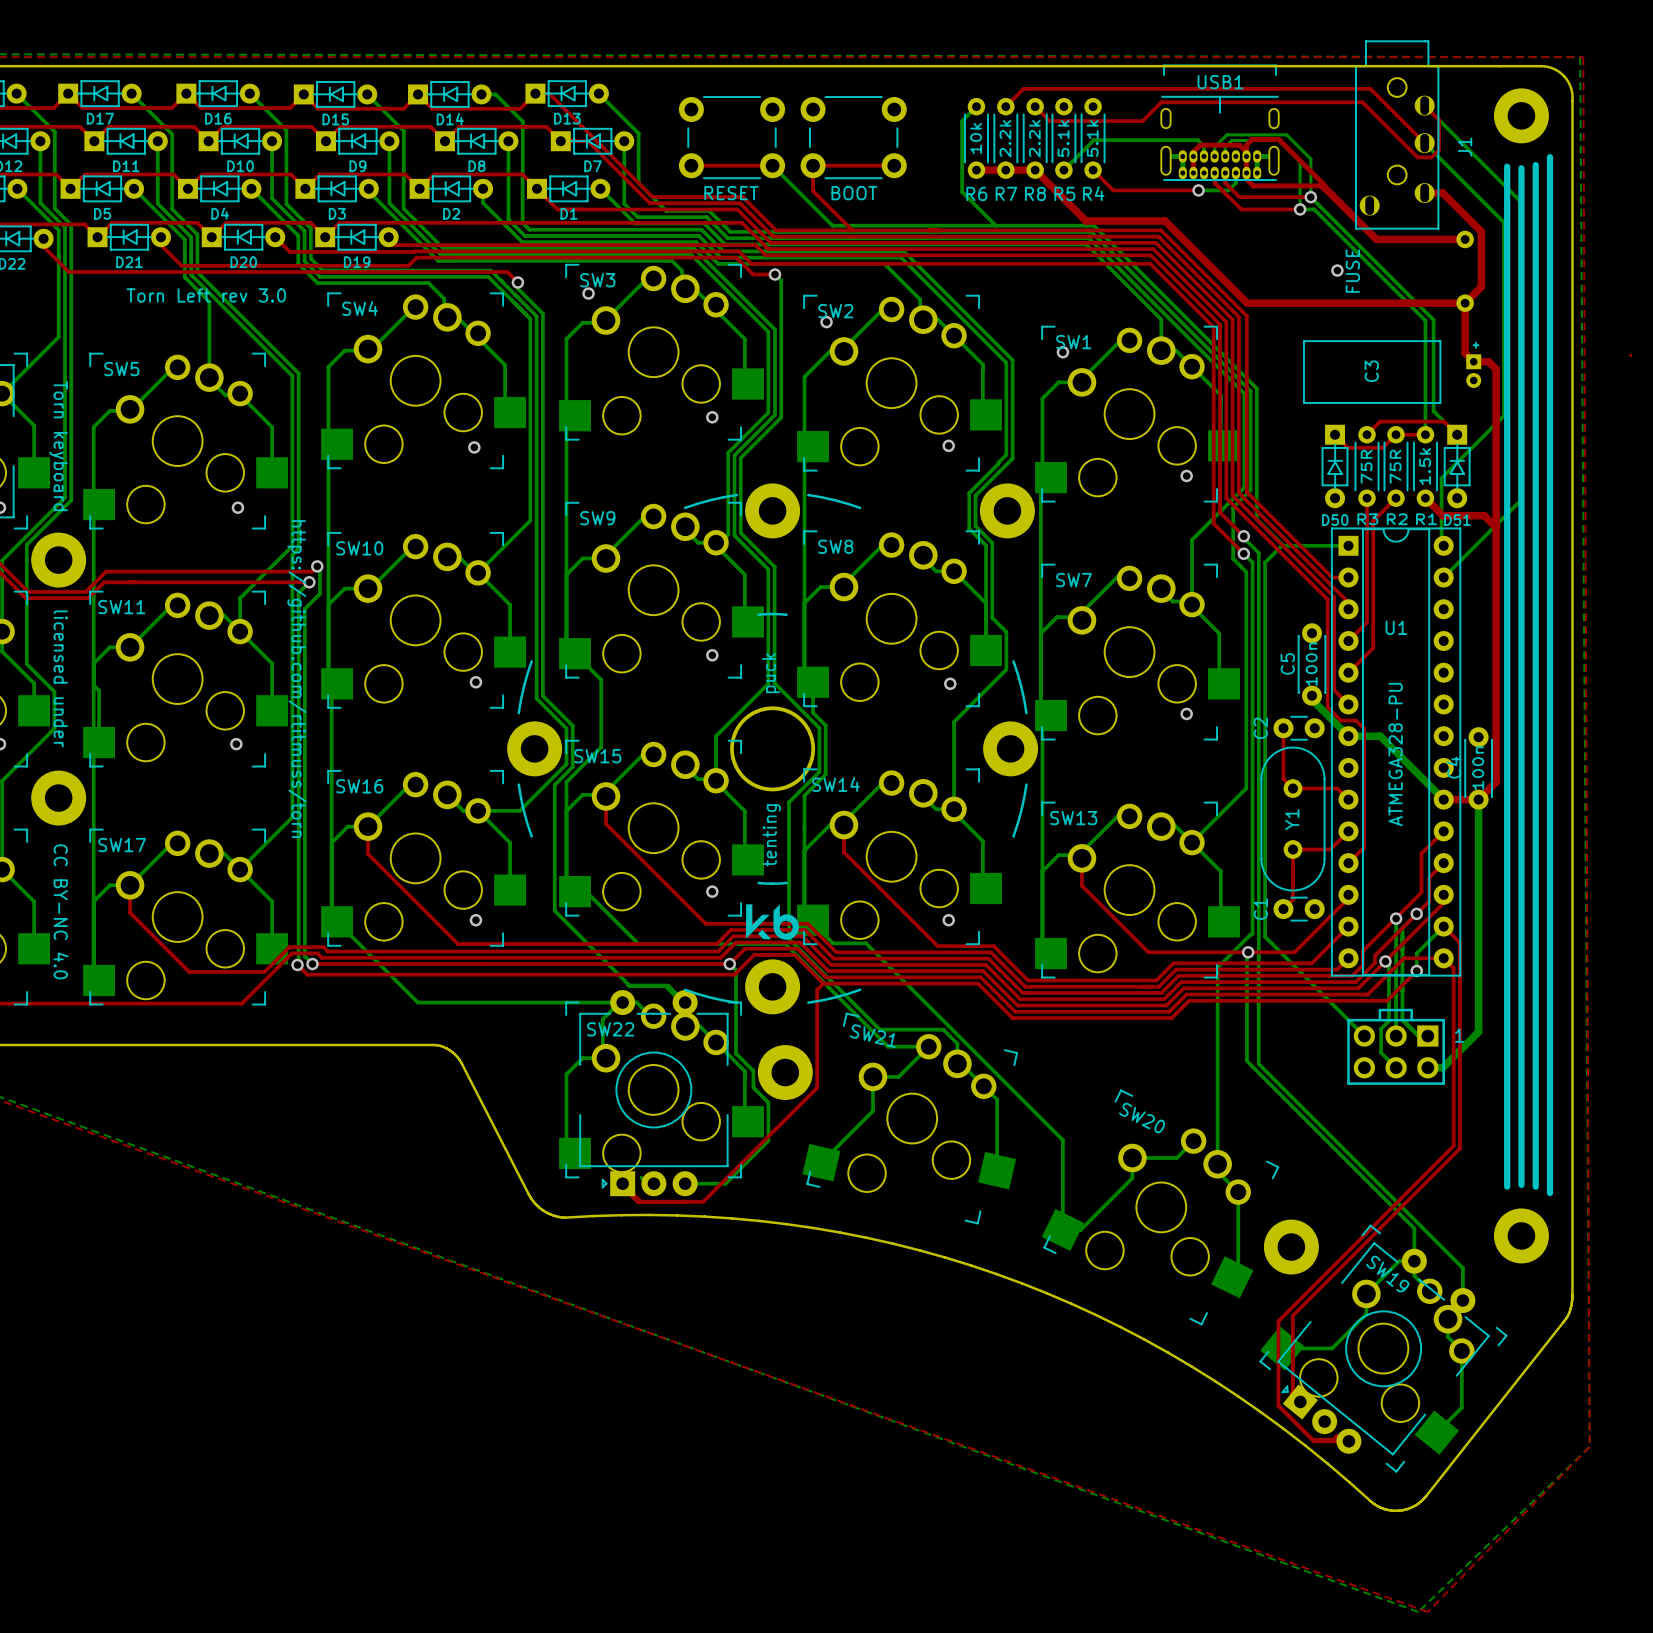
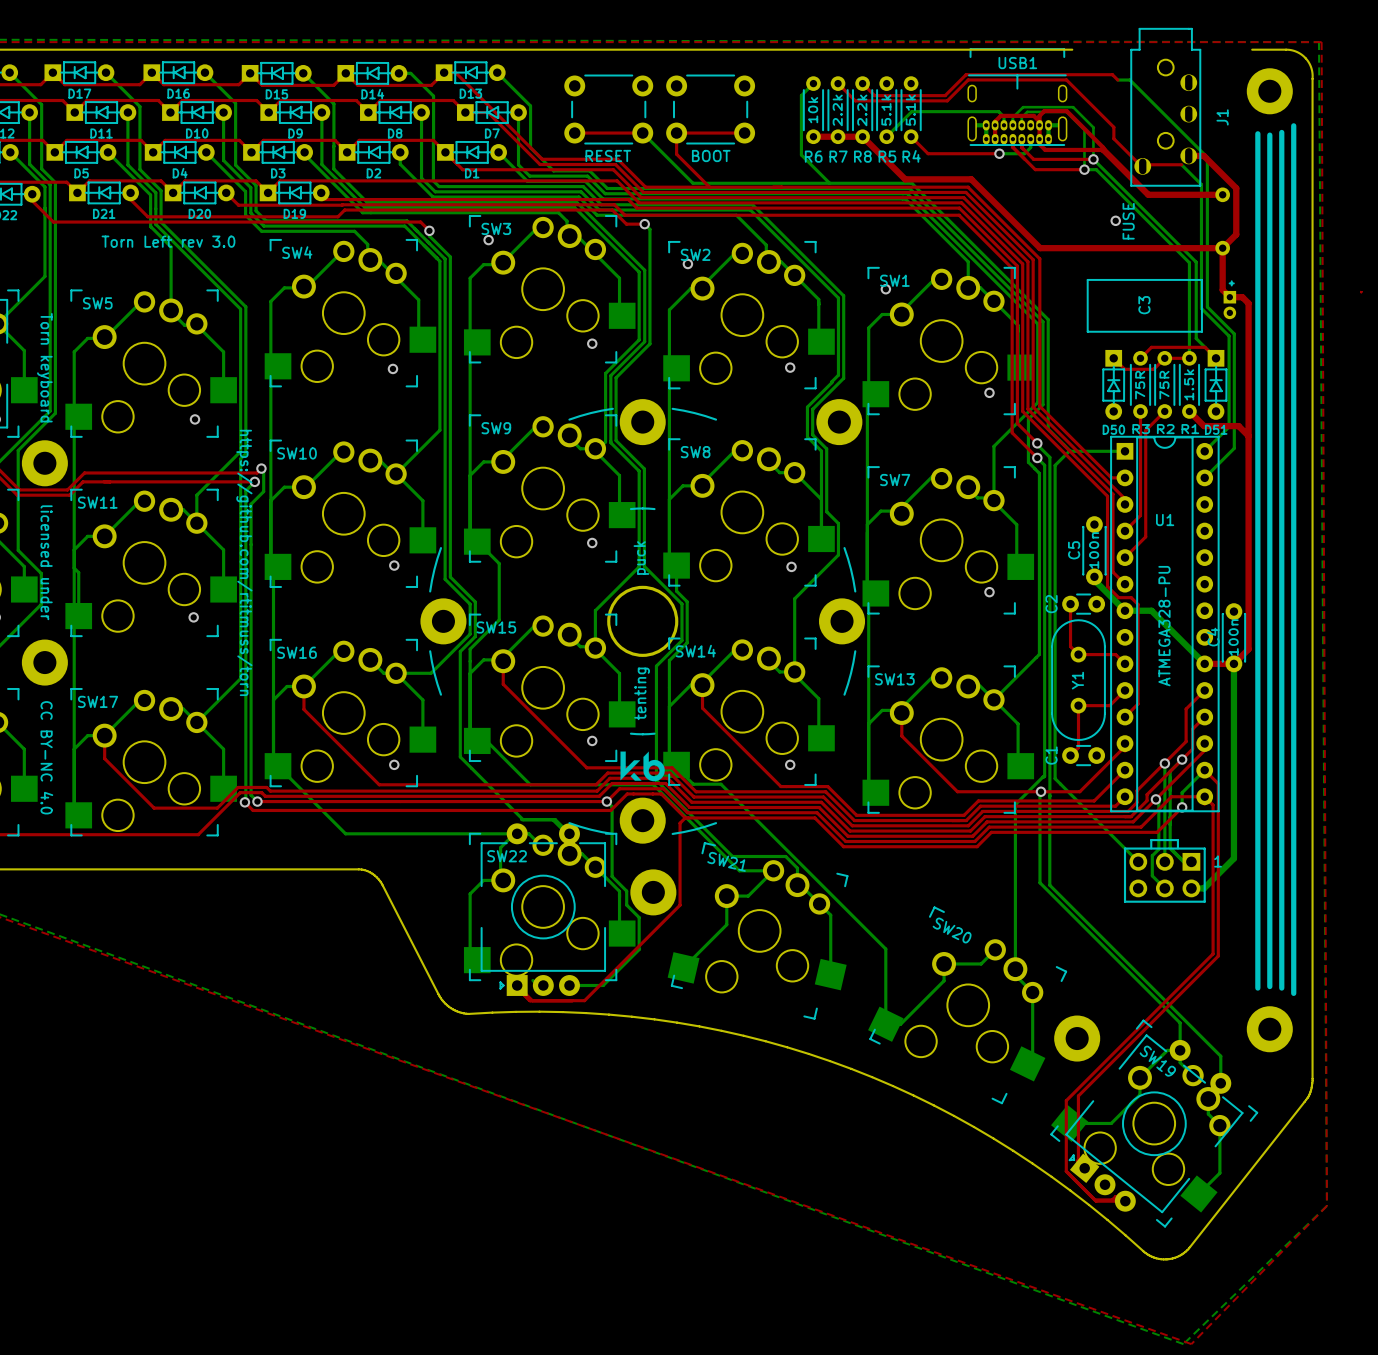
board edge: (1285, 66) (1500, 66) -> none
top track: (1278, 102) (1362, 102) (1417, 157) (1431, 157) (1439, 149) (1439, 119) (1424, 105) -> (1066, 79) (1113, 127) (1113, 138) (1139, 164) (1181, 164)
top track: none -> (1117, 80) (1112, 74) (966, 74) (945, 95)
bottom track: (1424, 105) (1519, 200) (1519, 501) (1479, 542) -> (1117, 80) (1129, 80) (1207, 157) (1207, 307) (1234, 333) (1234, 448)
top track: (1005, 106) (1023, 88) (1370, 88) (1424, 143) -> none
top track: (1133, 121) (1142, 121) -> (838, 83) (855, 100) (947, 100) (952, 95)
bottom track: (1424, 143) (1503, 222) (1503, 415) (1441, 478) (1441, 543) (1443, 545) -> (1181, 164) (1201, 184) (1201, 308) (1229, 336) (1229, 426) (1204, 451)

